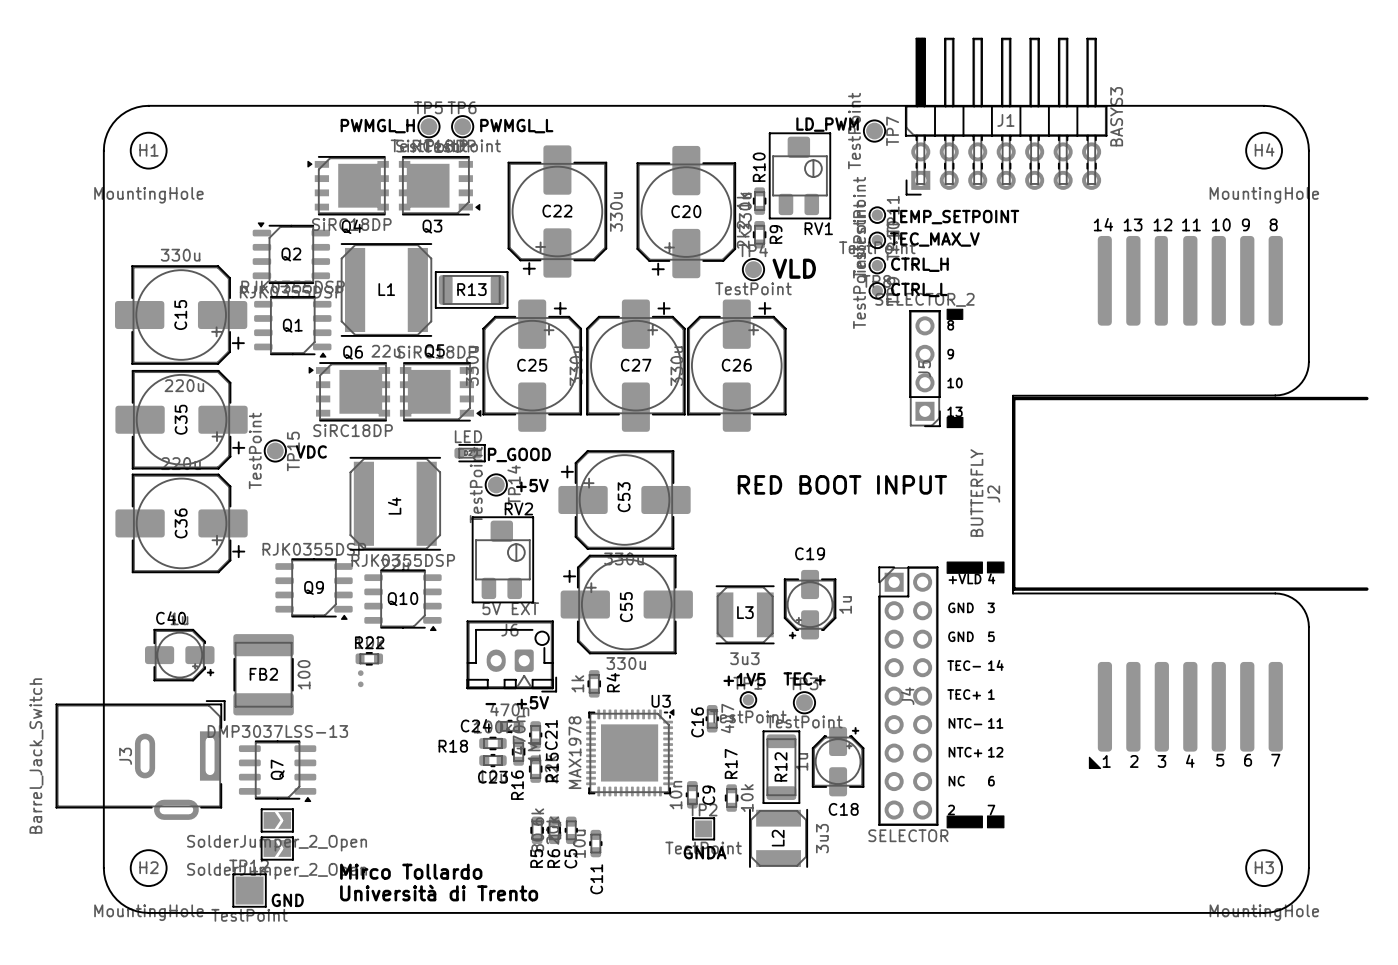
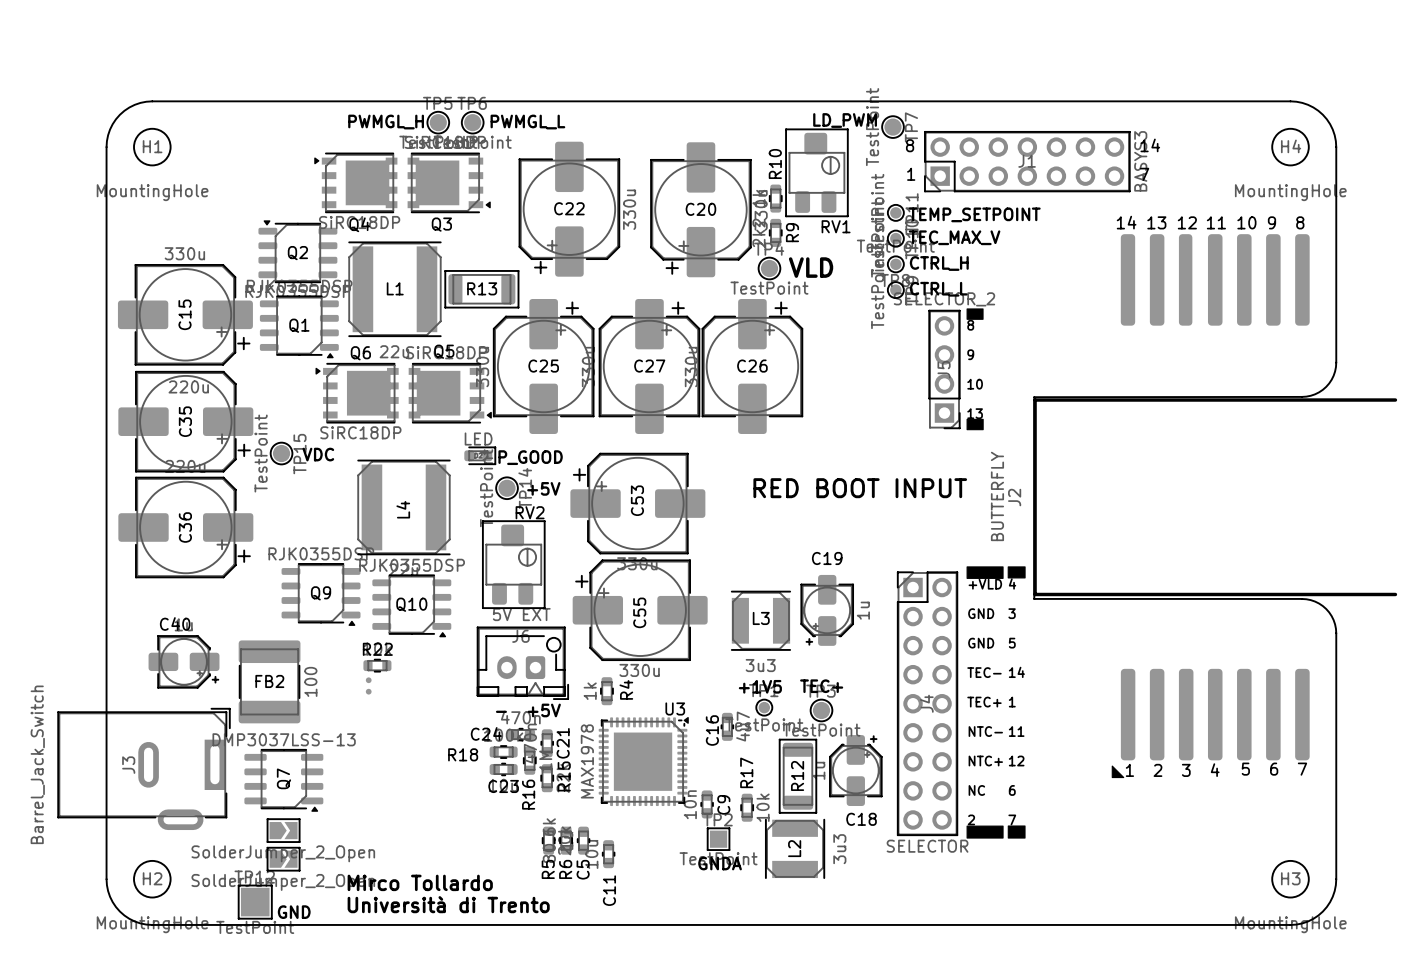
J1 footprint: [905, 38, 1108, 196] -> [924, 131, 1131, 193]
text: none -> 8 (910, 145)
text: none -> 14 (1150, 145)
text: none -> 1 (911, 174)
text: none -> 7 (1144, 174)

